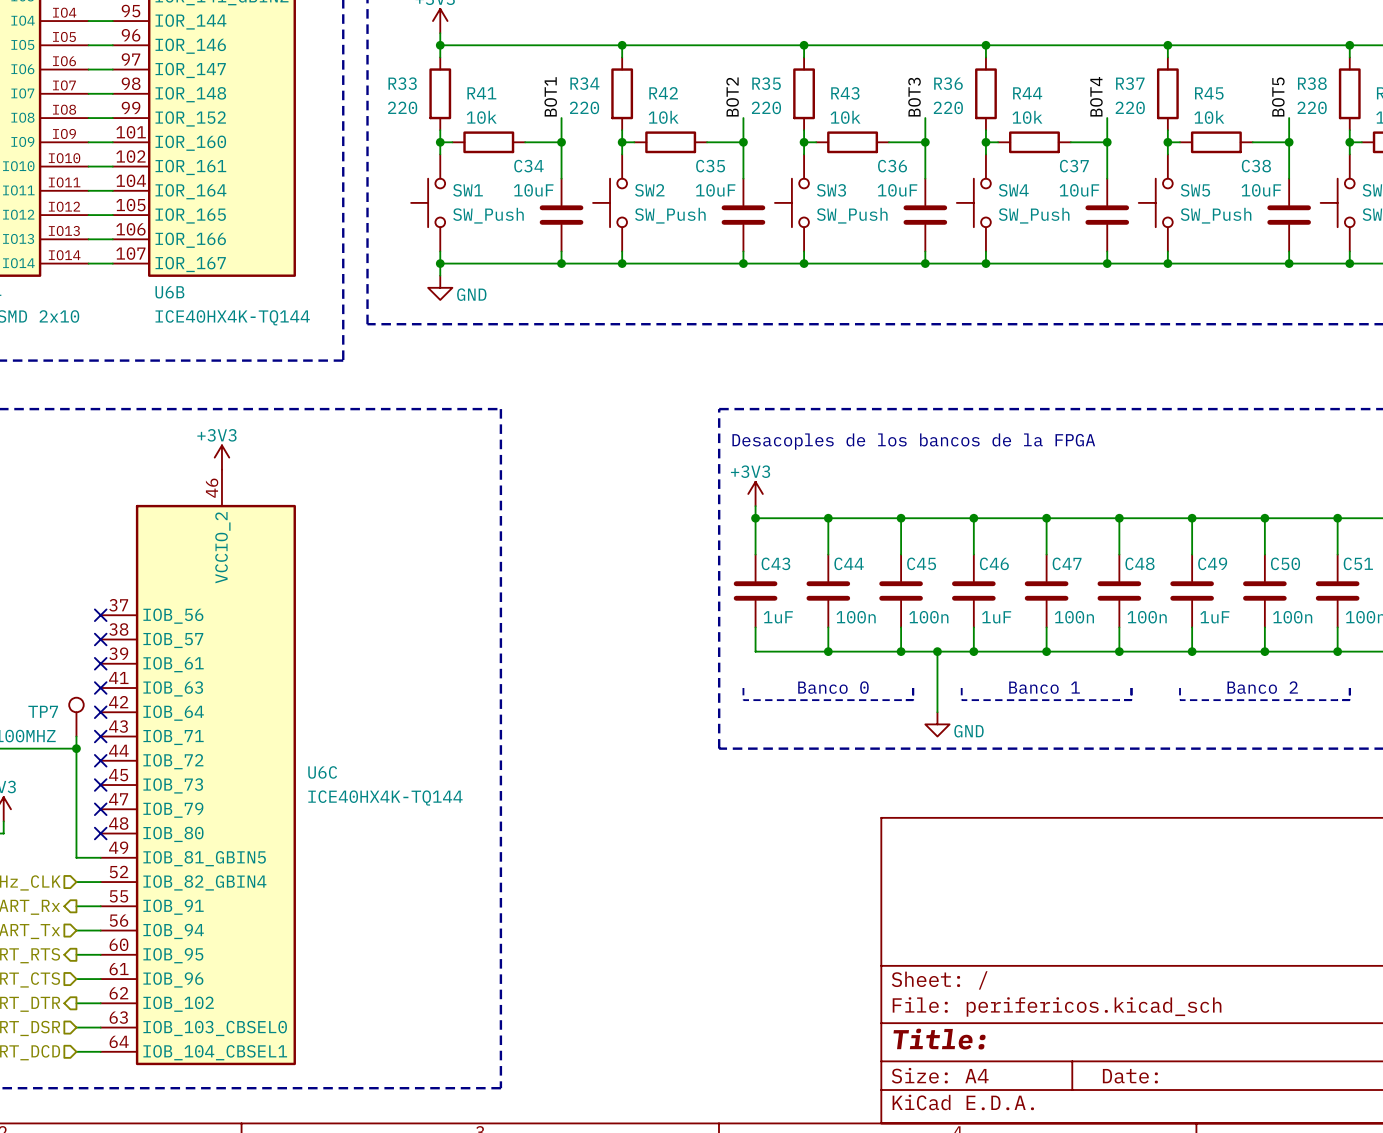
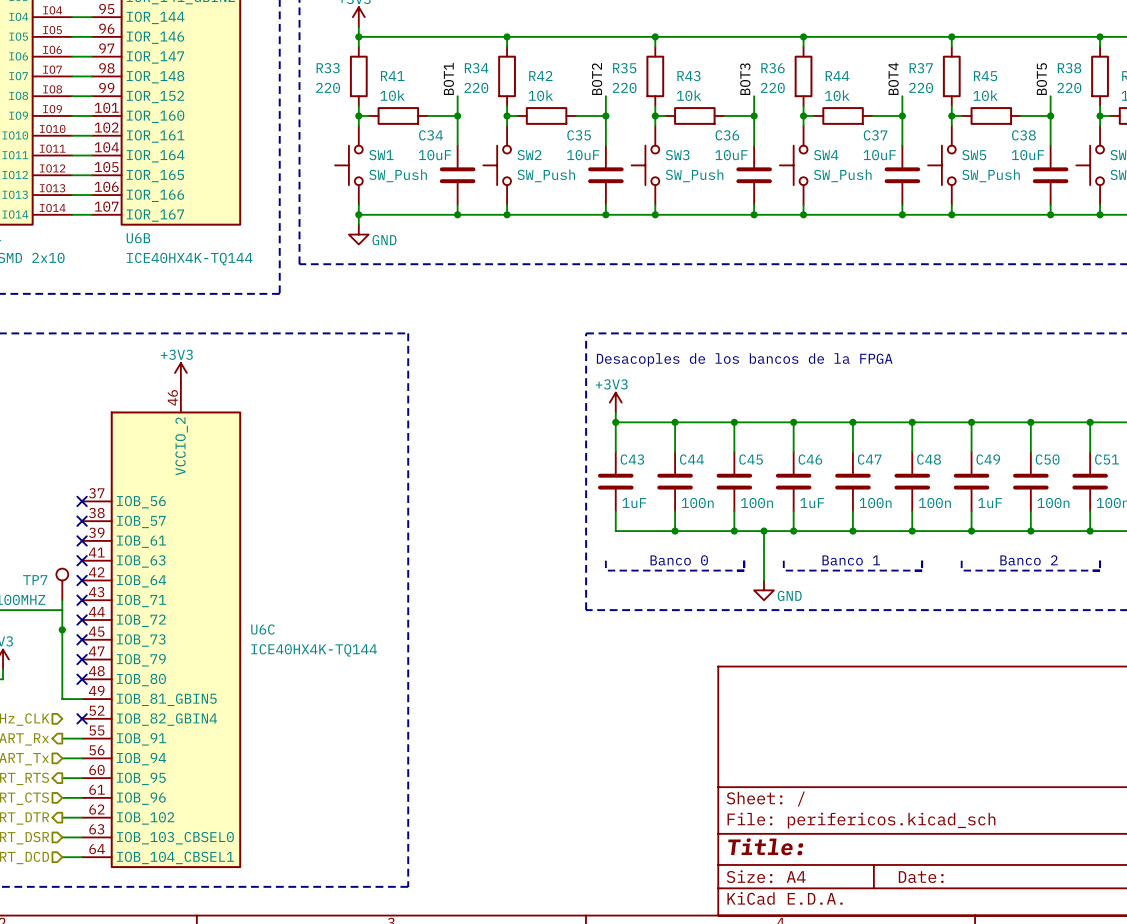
junction position: (76, 748) -> (62, 629)
wire: (76, 882) (100, 882) -> none
no-connect mark: none -> (82, 718)

